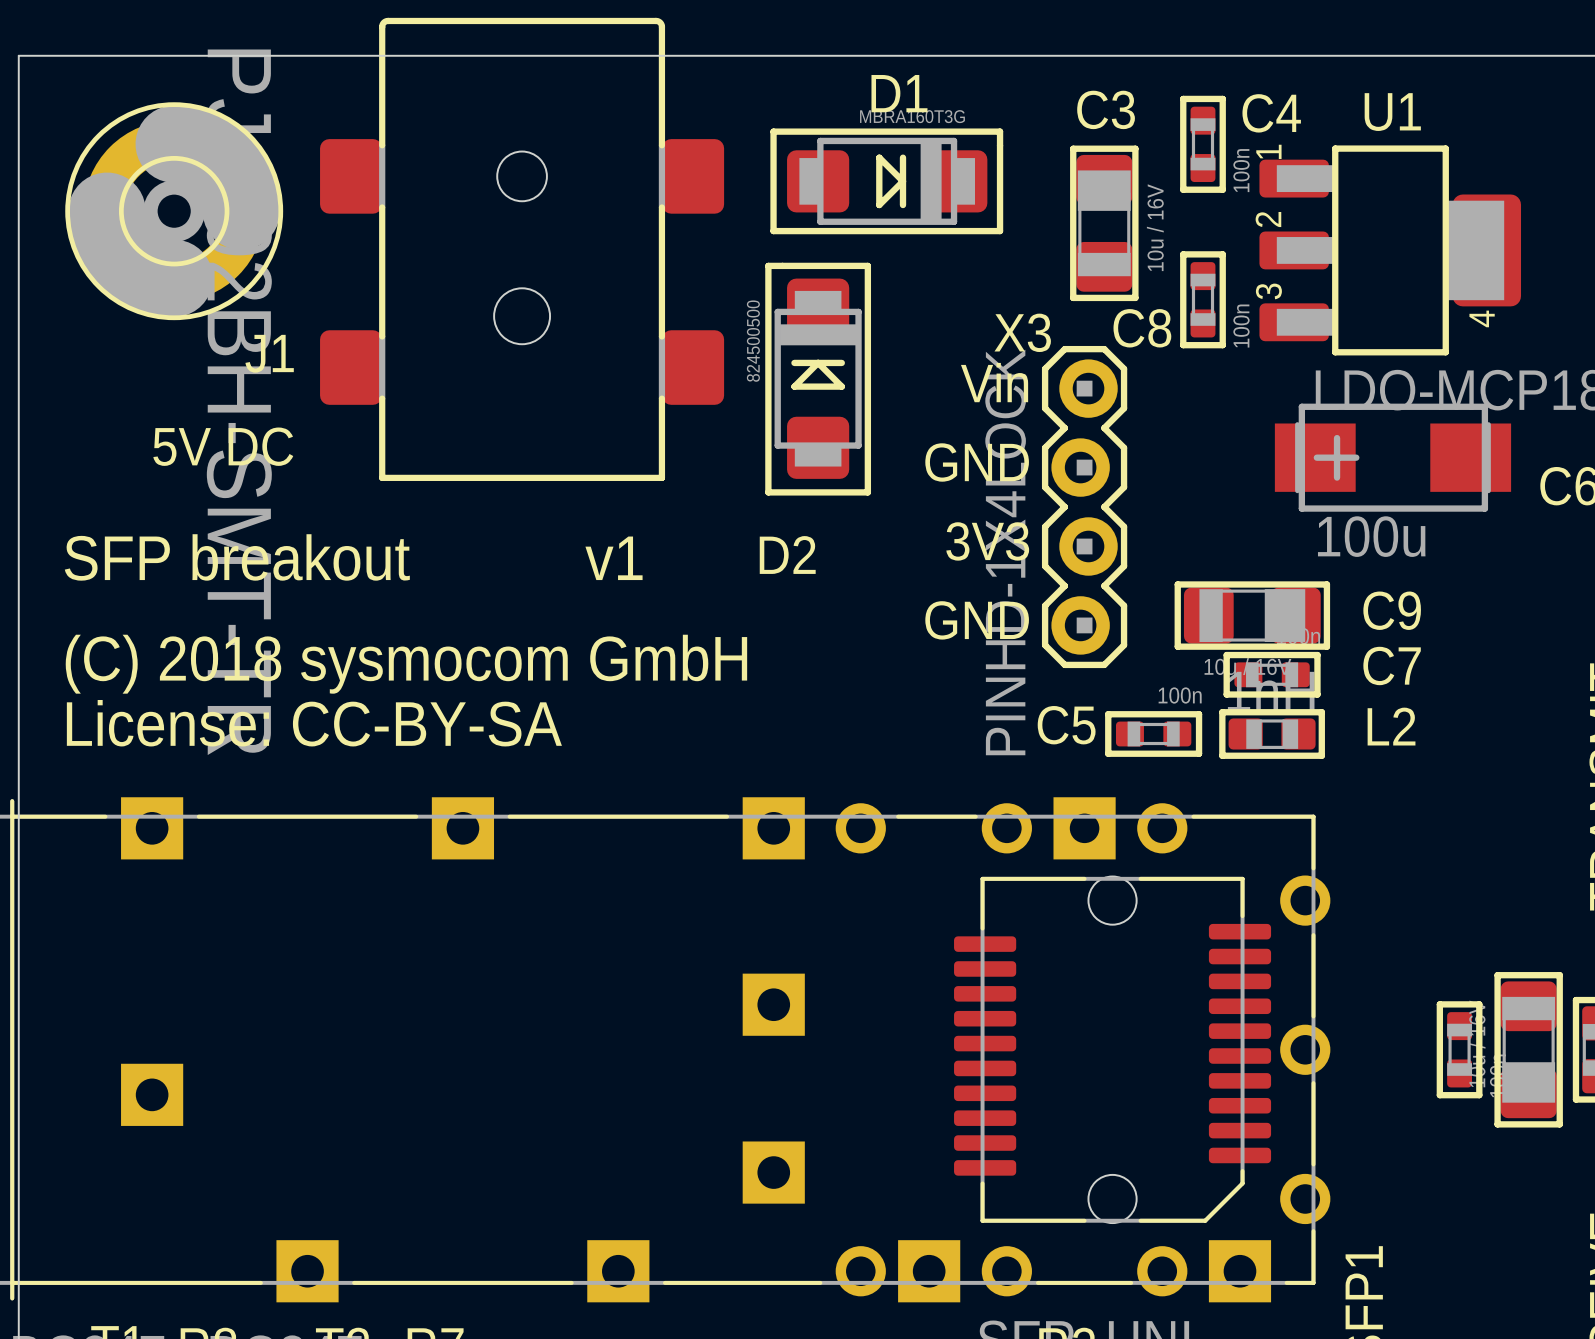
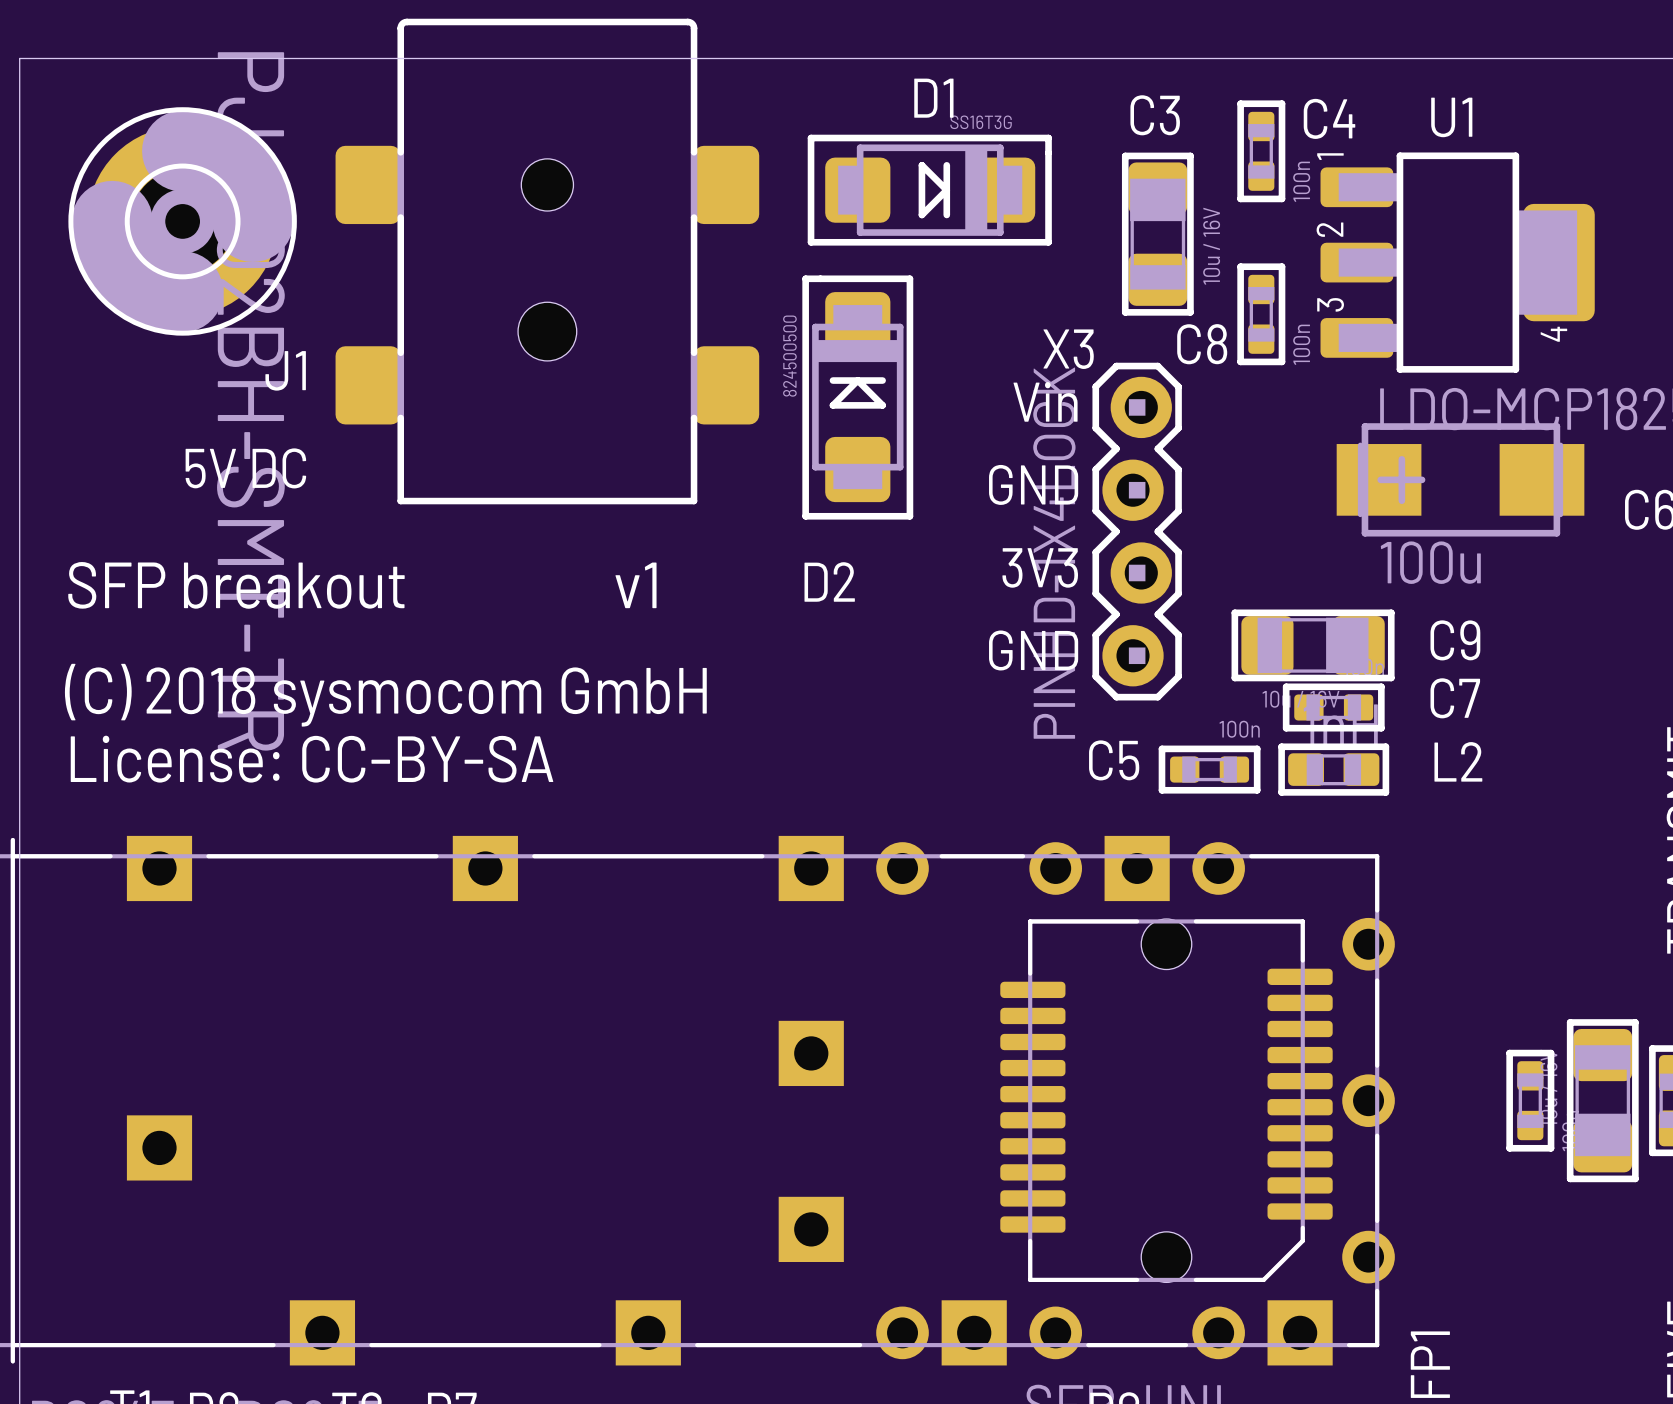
D1 value: MBRA160T3G (912, 116) -> SS16T3G (981, 122)

